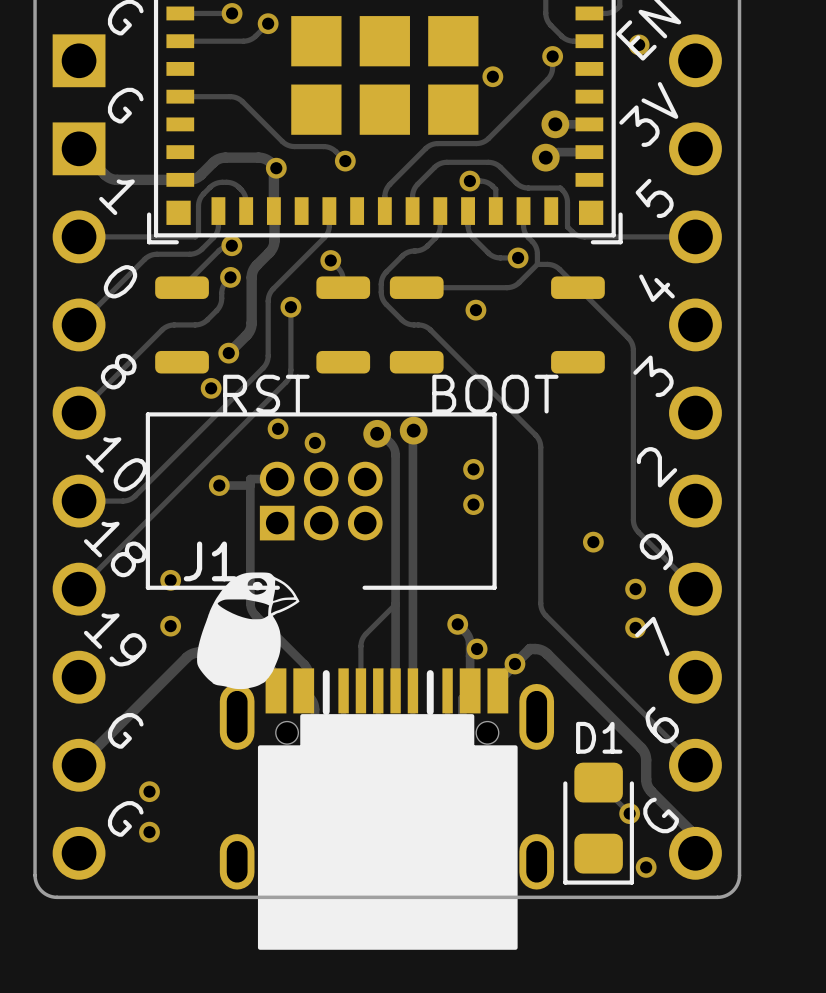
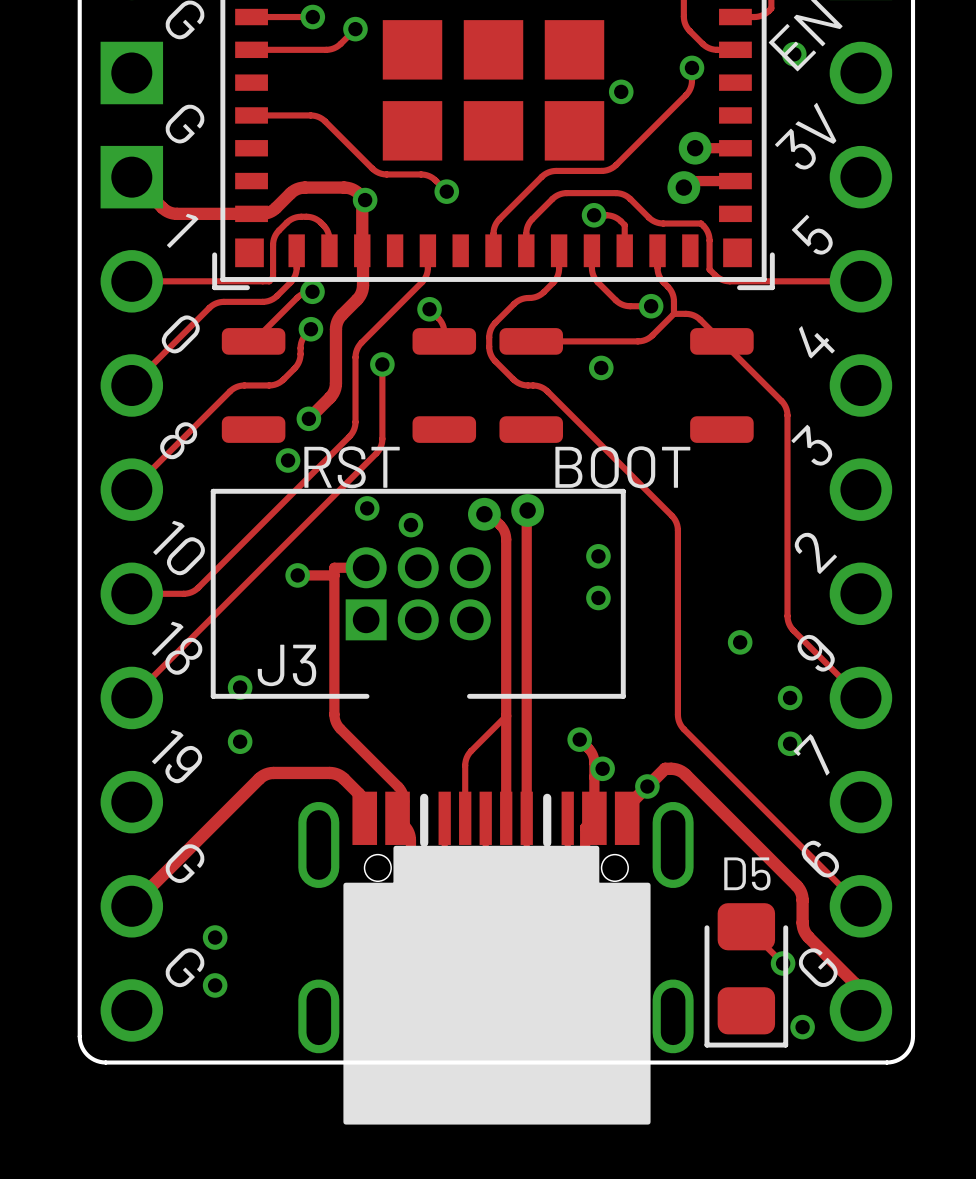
J1 name: J1 (210, 561) -> J3 (287, 665)
drawing: [197, 572, 300, 690] -> none
part footprint: [219, 668, 555, 950] -> [298, 791, 694, 1125]
D1 name: D1 (599, 737) -> D5 (747, 873)

